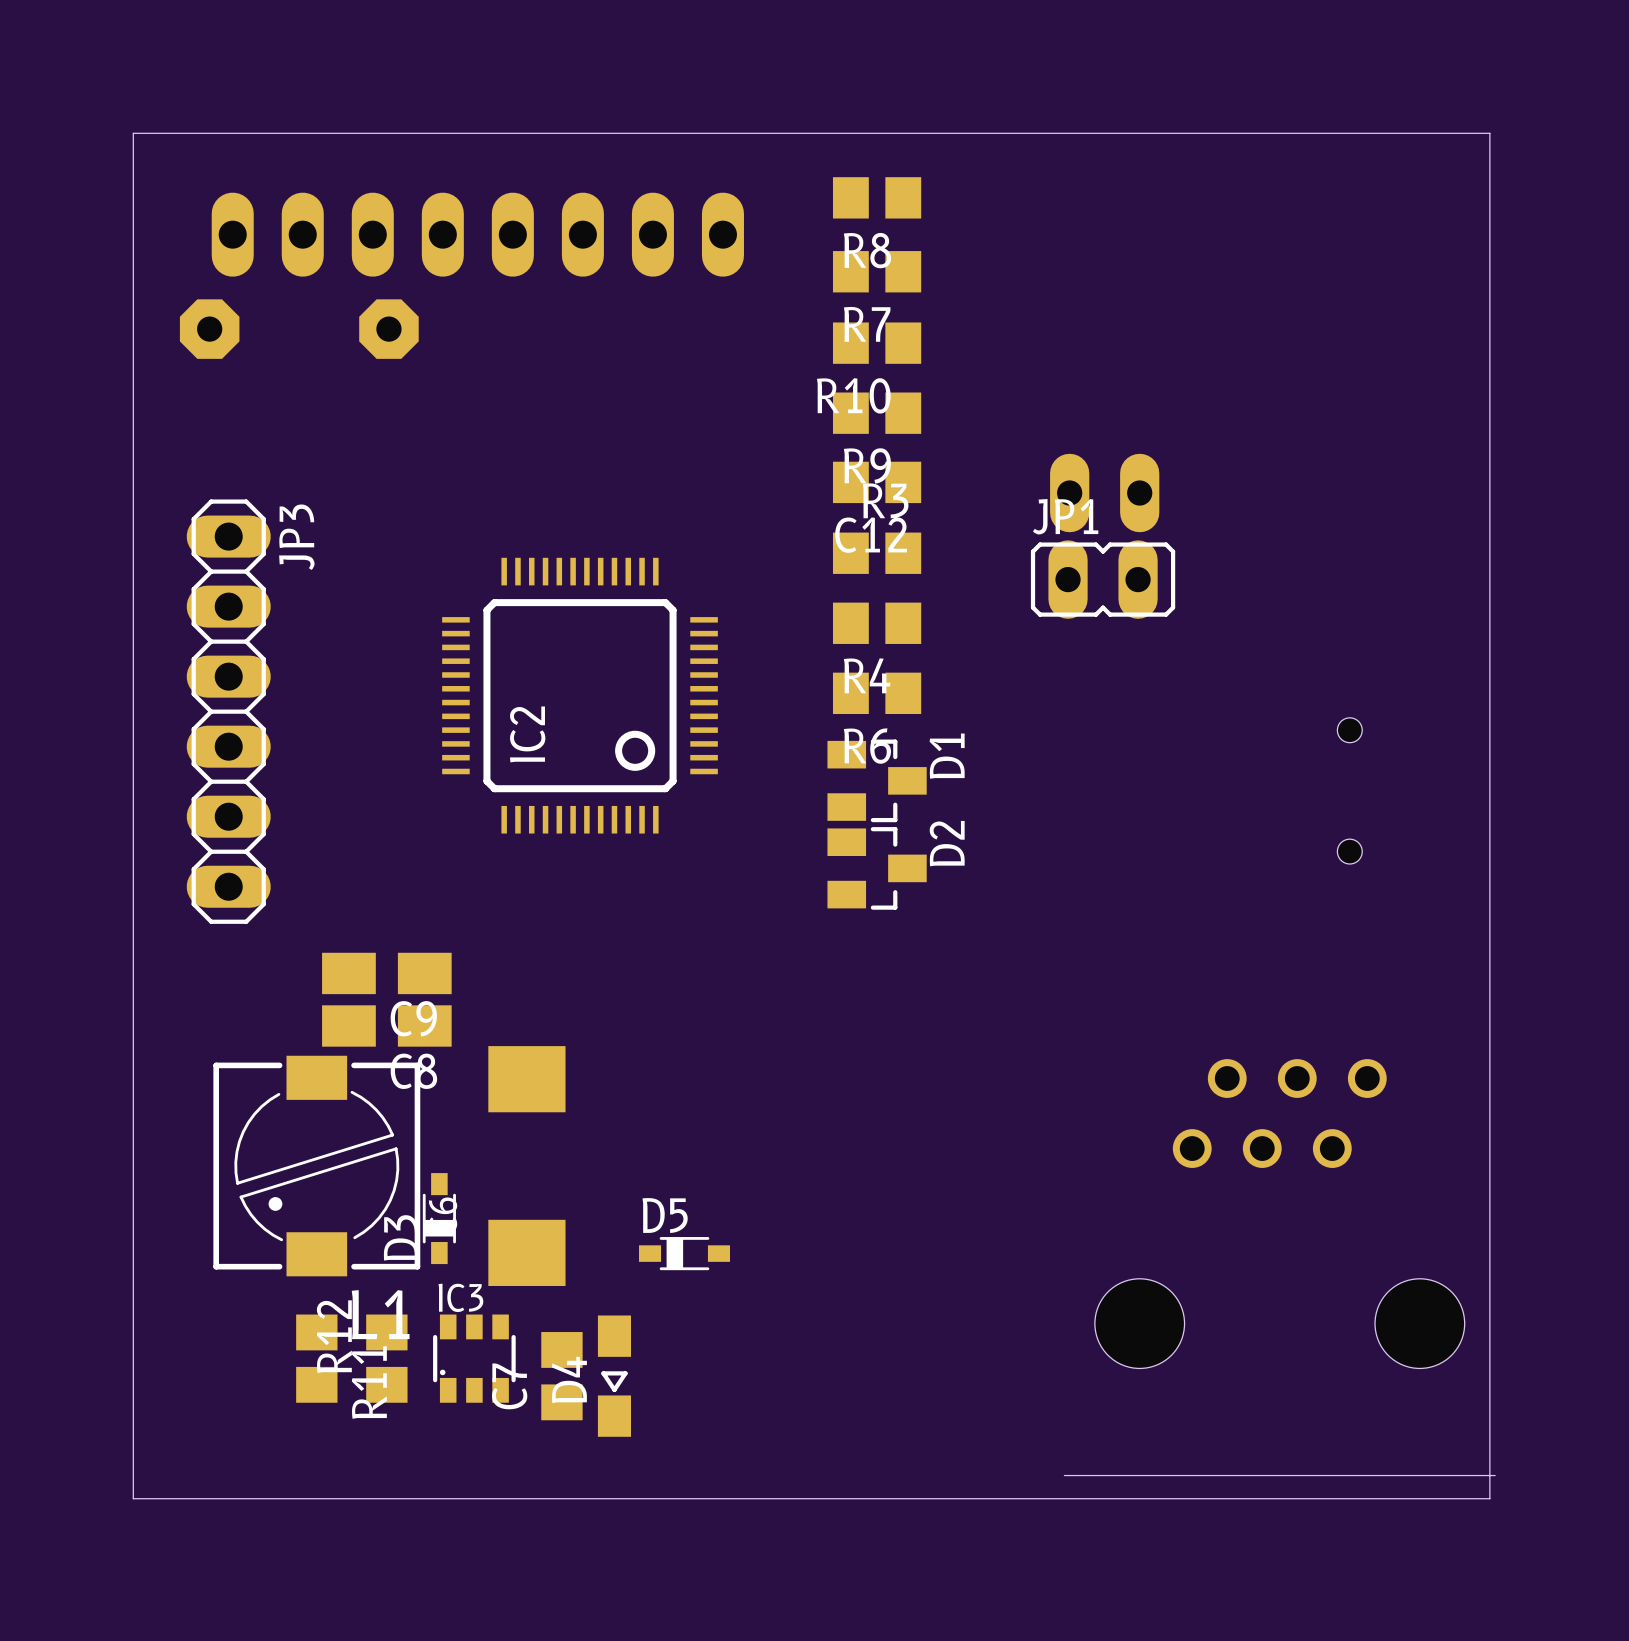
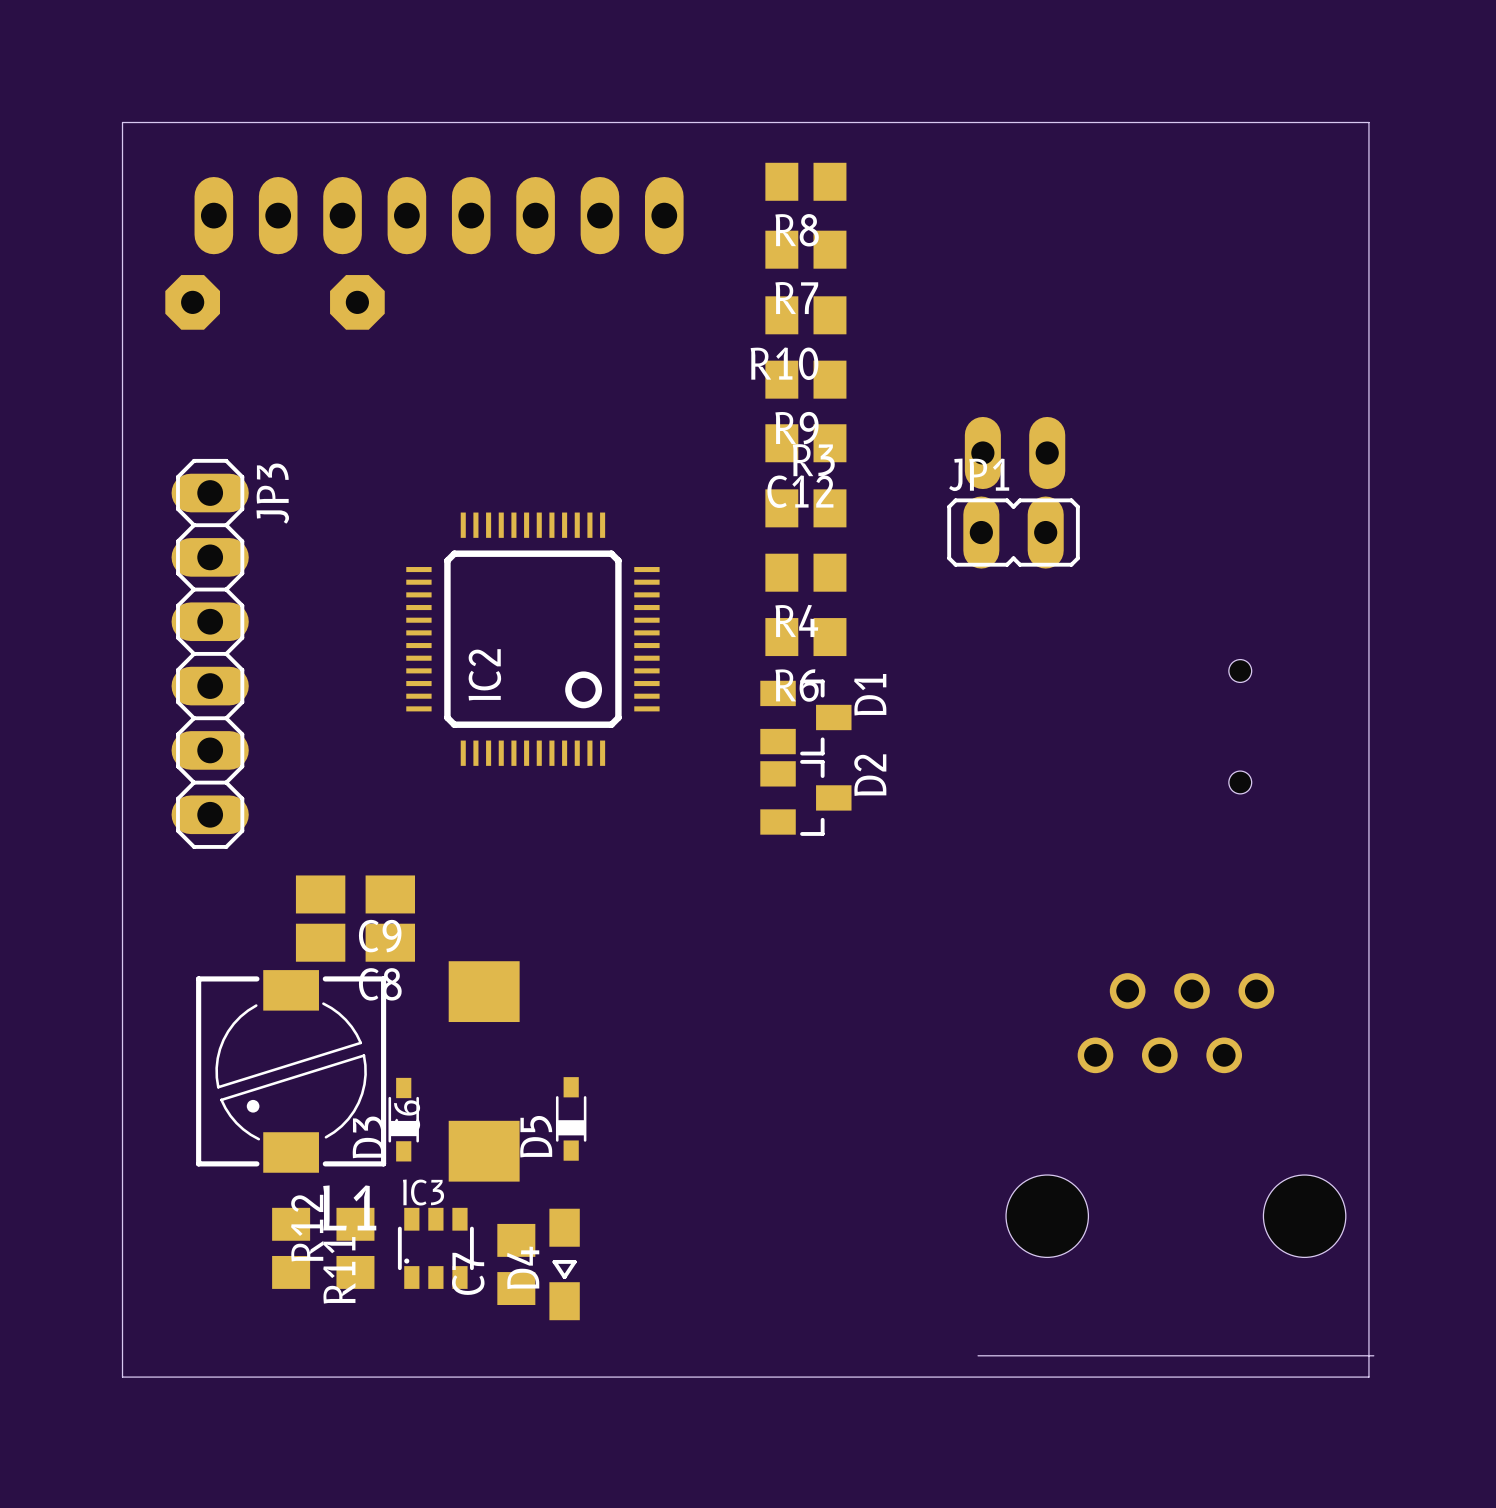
D5 rotation: 0° (684, 1253) -> 90° counterclockwise (571, 1118)
D5 position: (684, 1253) -> (571, 1118)

